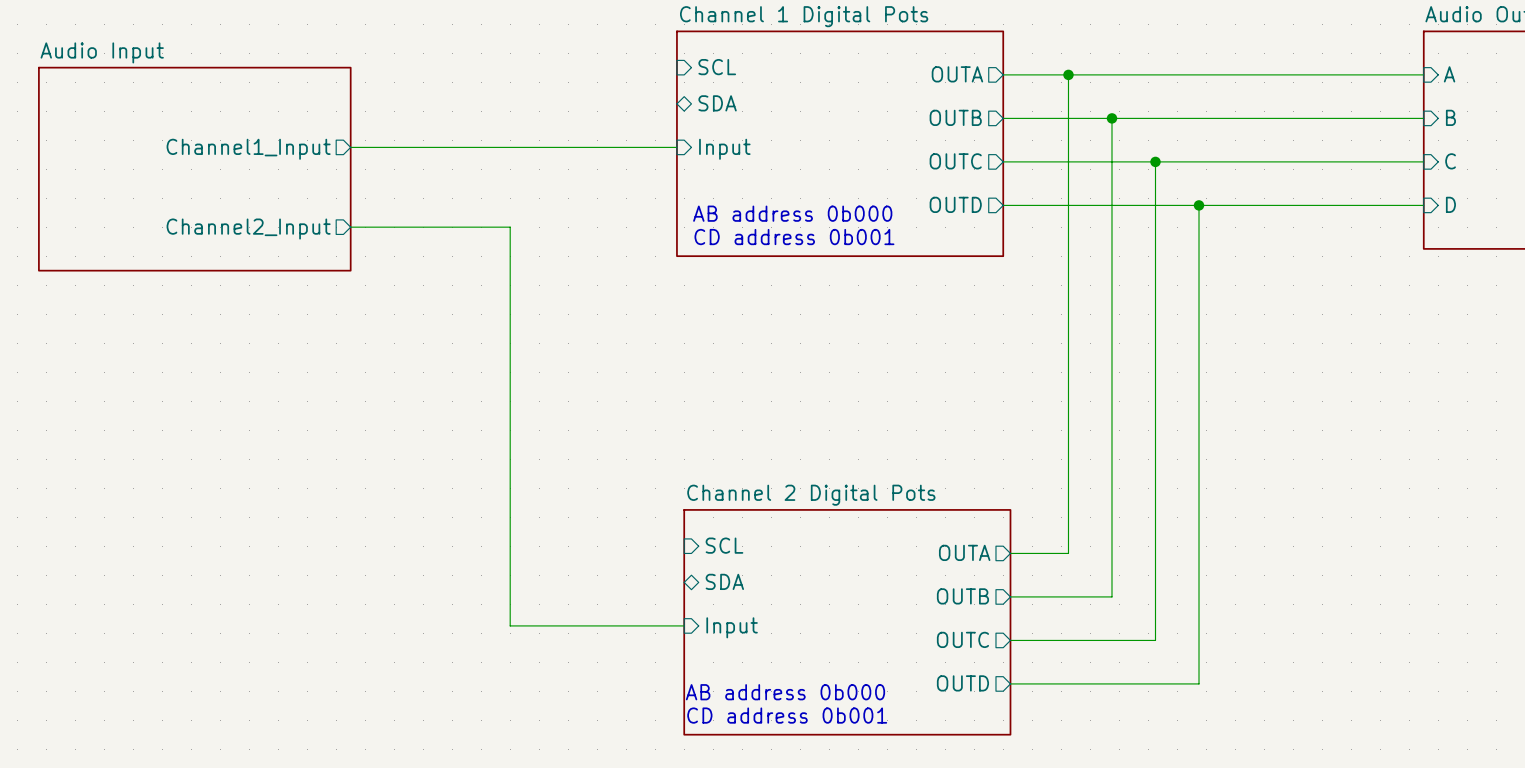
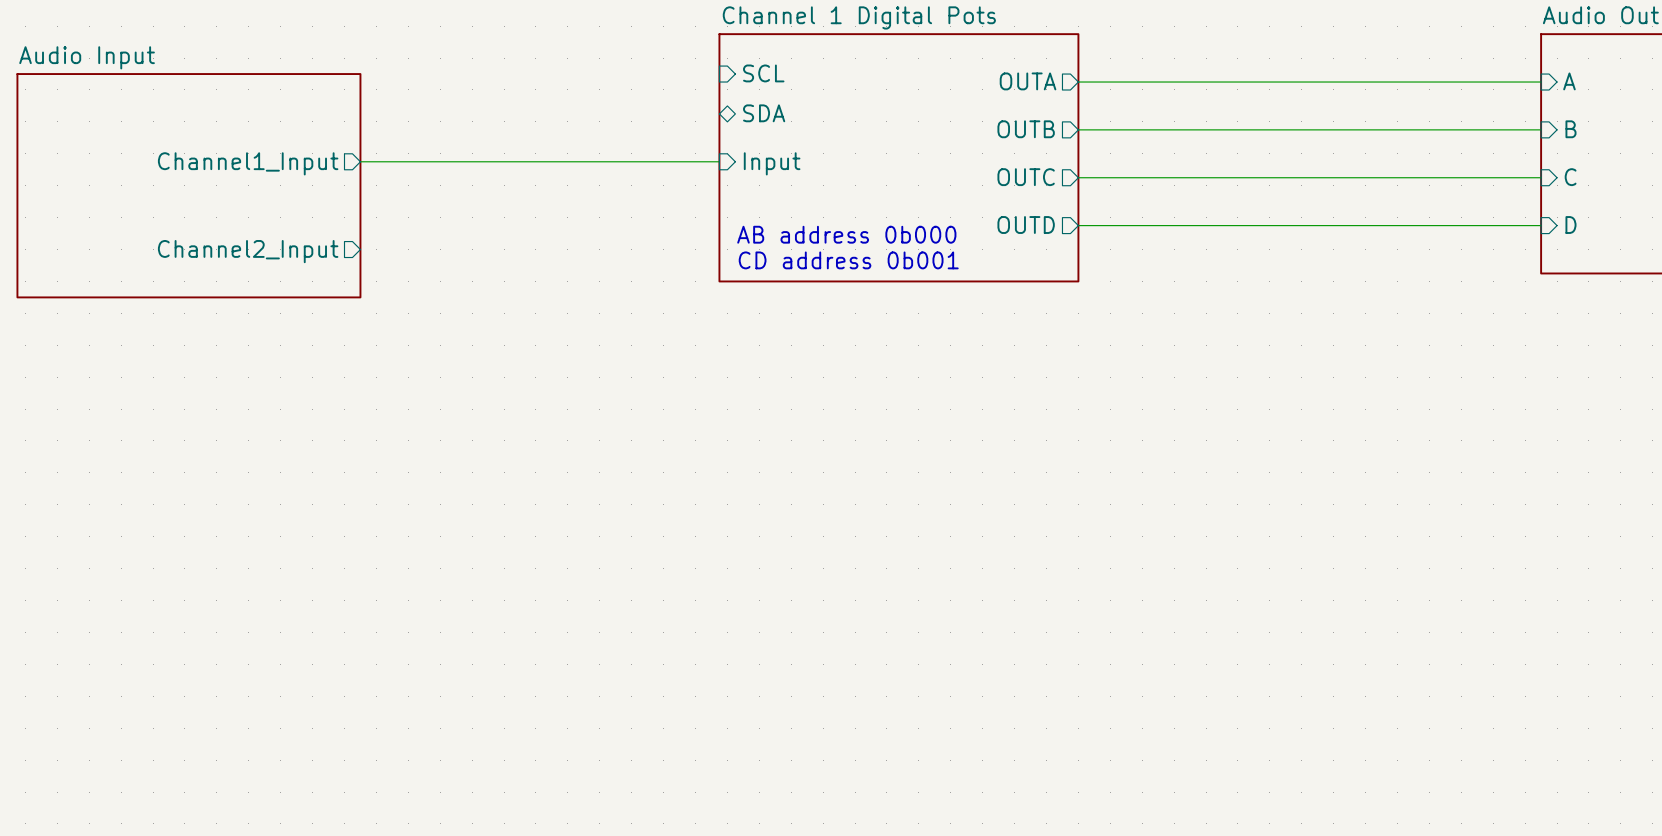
wire: (1068, 74) (1068, 553) (1010, 553) -> none
junction: (1068, 74) -> none
wire: (1111, 118) (1111, 596) (1010, 596) -> none
junction: (1111, 118) -> none
wire: (1155, 161) (1155, 640) (1010, 640) -> none
junction: (1155, 161) -> none
wire: (1199, 205) (1199, 683) (1010, 683) -> none
junction: (1199, 205) -> none
wire: (350, 227) (510, 227) (510, 625) (684, 625) -> none
sheet pin: SCL (724, 545) -> none
sheet pin: OUTA (964, 552) -> none
sheet pin: SDA (724, 581) -> none
sheet pin: OUTB (962, 596) -> none
sheet Channel 2 Digital Pots: (847, 622) -> none
sheet pin: Input (732, 627) -> none
sheet pin: OUTC (962, 639) -> none
sheet pin: OUTD (962, 683) -> none
text: AB address 0b000 (785, 692) -> none
text: CD address 0b001 (787, 715) -> none

